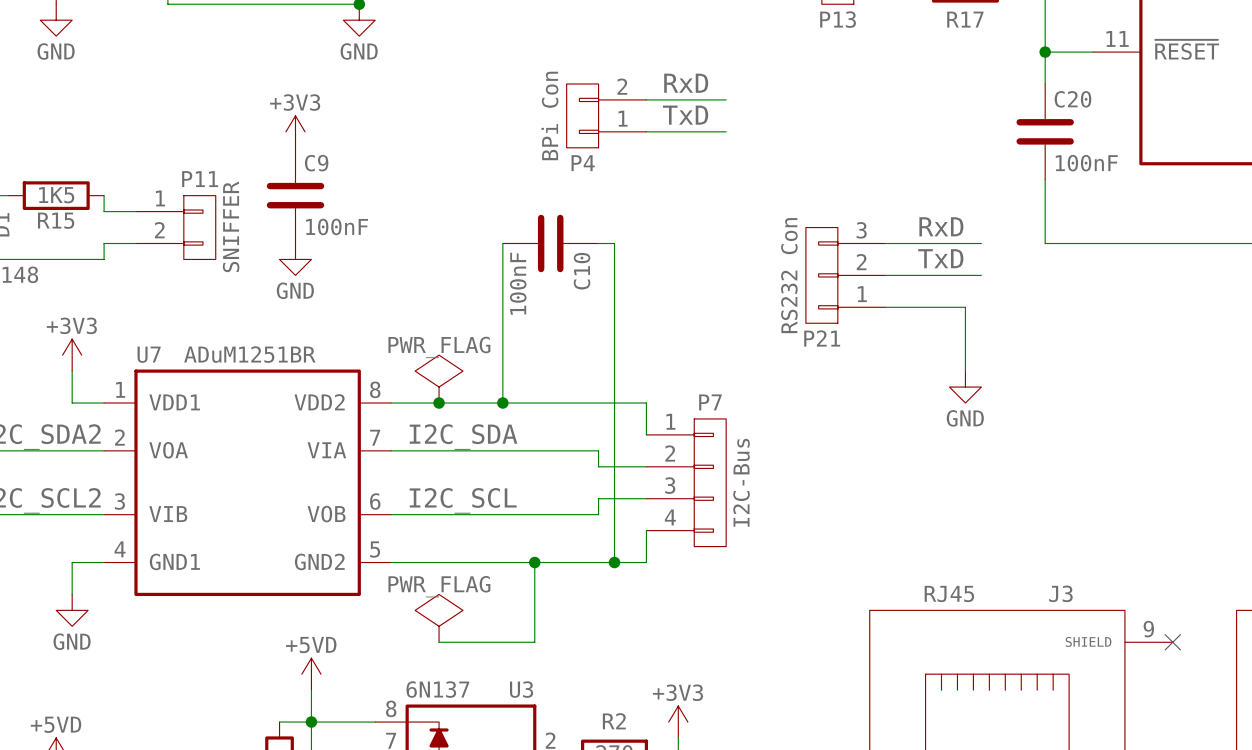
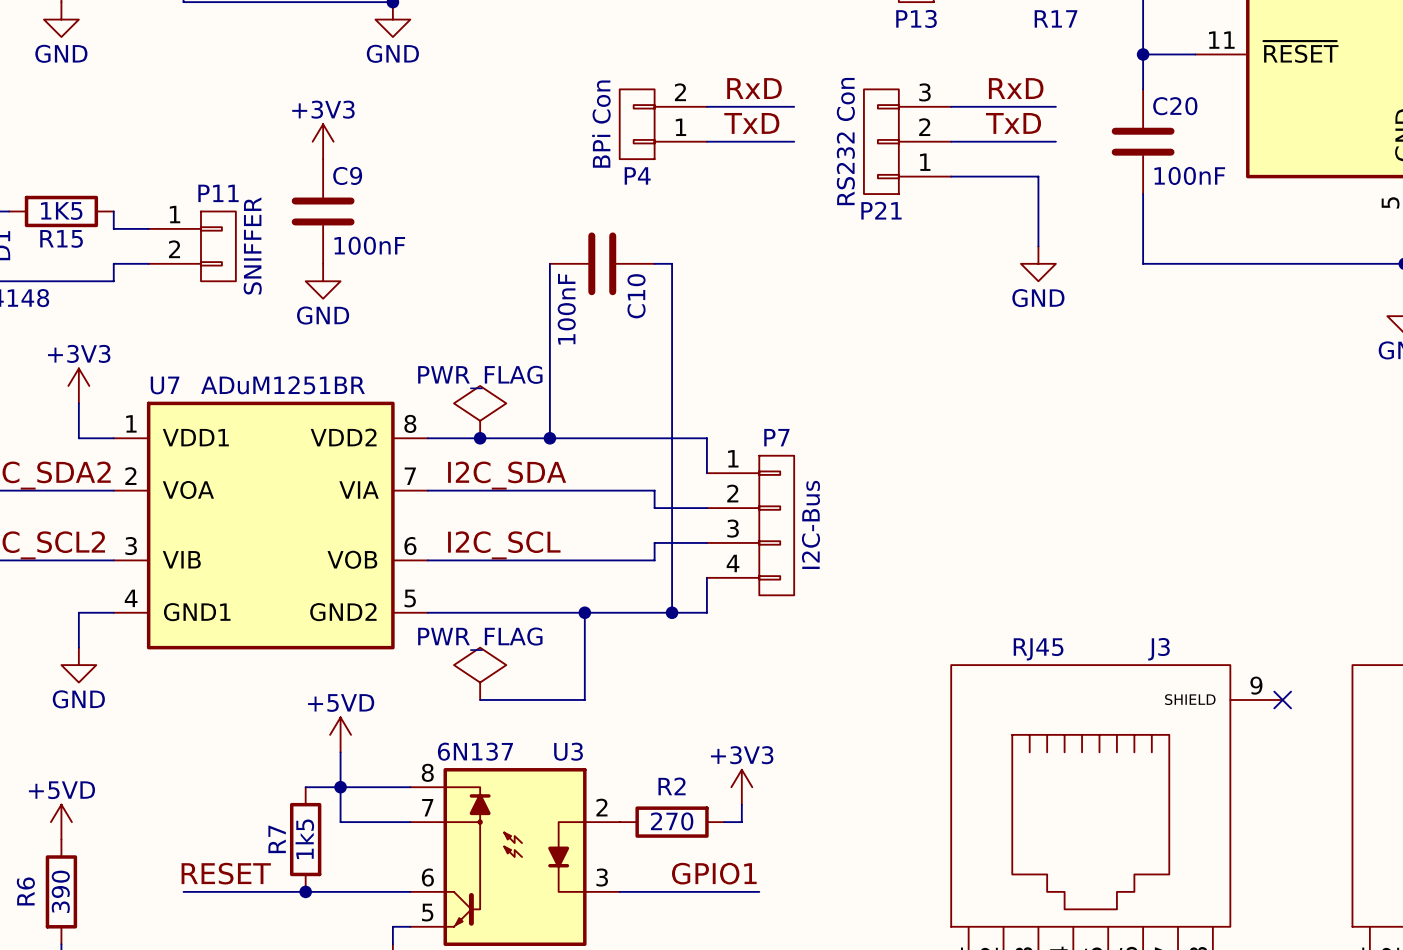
label position: RxD (941, 226) -> RxD (1016, 88)
wire: (885, 243) (981, 243) -> (951, 106) (1055, 106)
label position: TxD (940, 258) -> TxD (1013, 123)
P21 position: (845, 275) -> (907, 141)
wire: (885, 275) (981, 275) -> (951, 141) (1055, 141)
wire: (885, 307) (965, 307) (965, 371) -> (951, 176) (1038, 176) (1038, 246)
power symbol position: GND (965, 387) -> GND (1038, 263)

